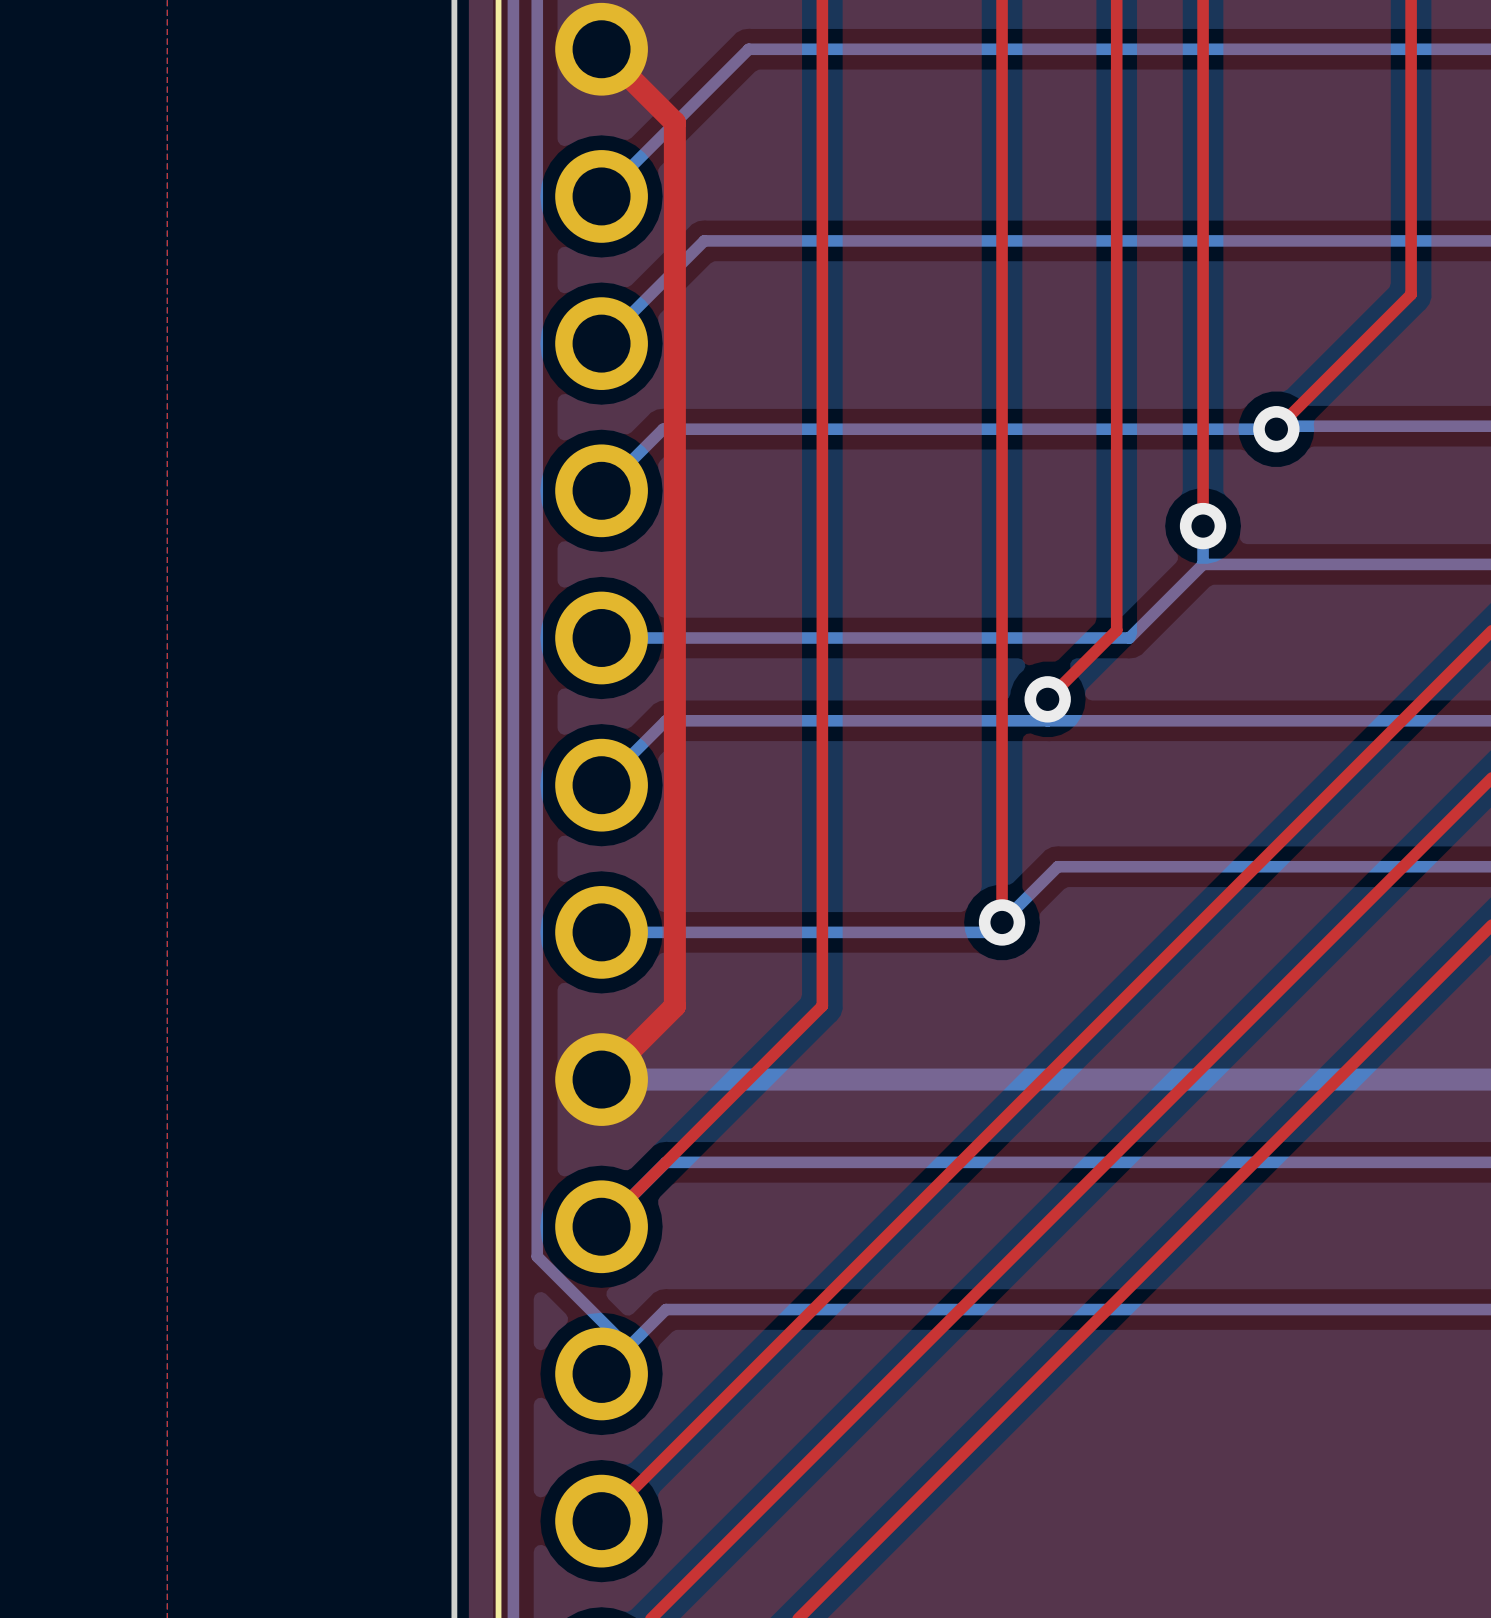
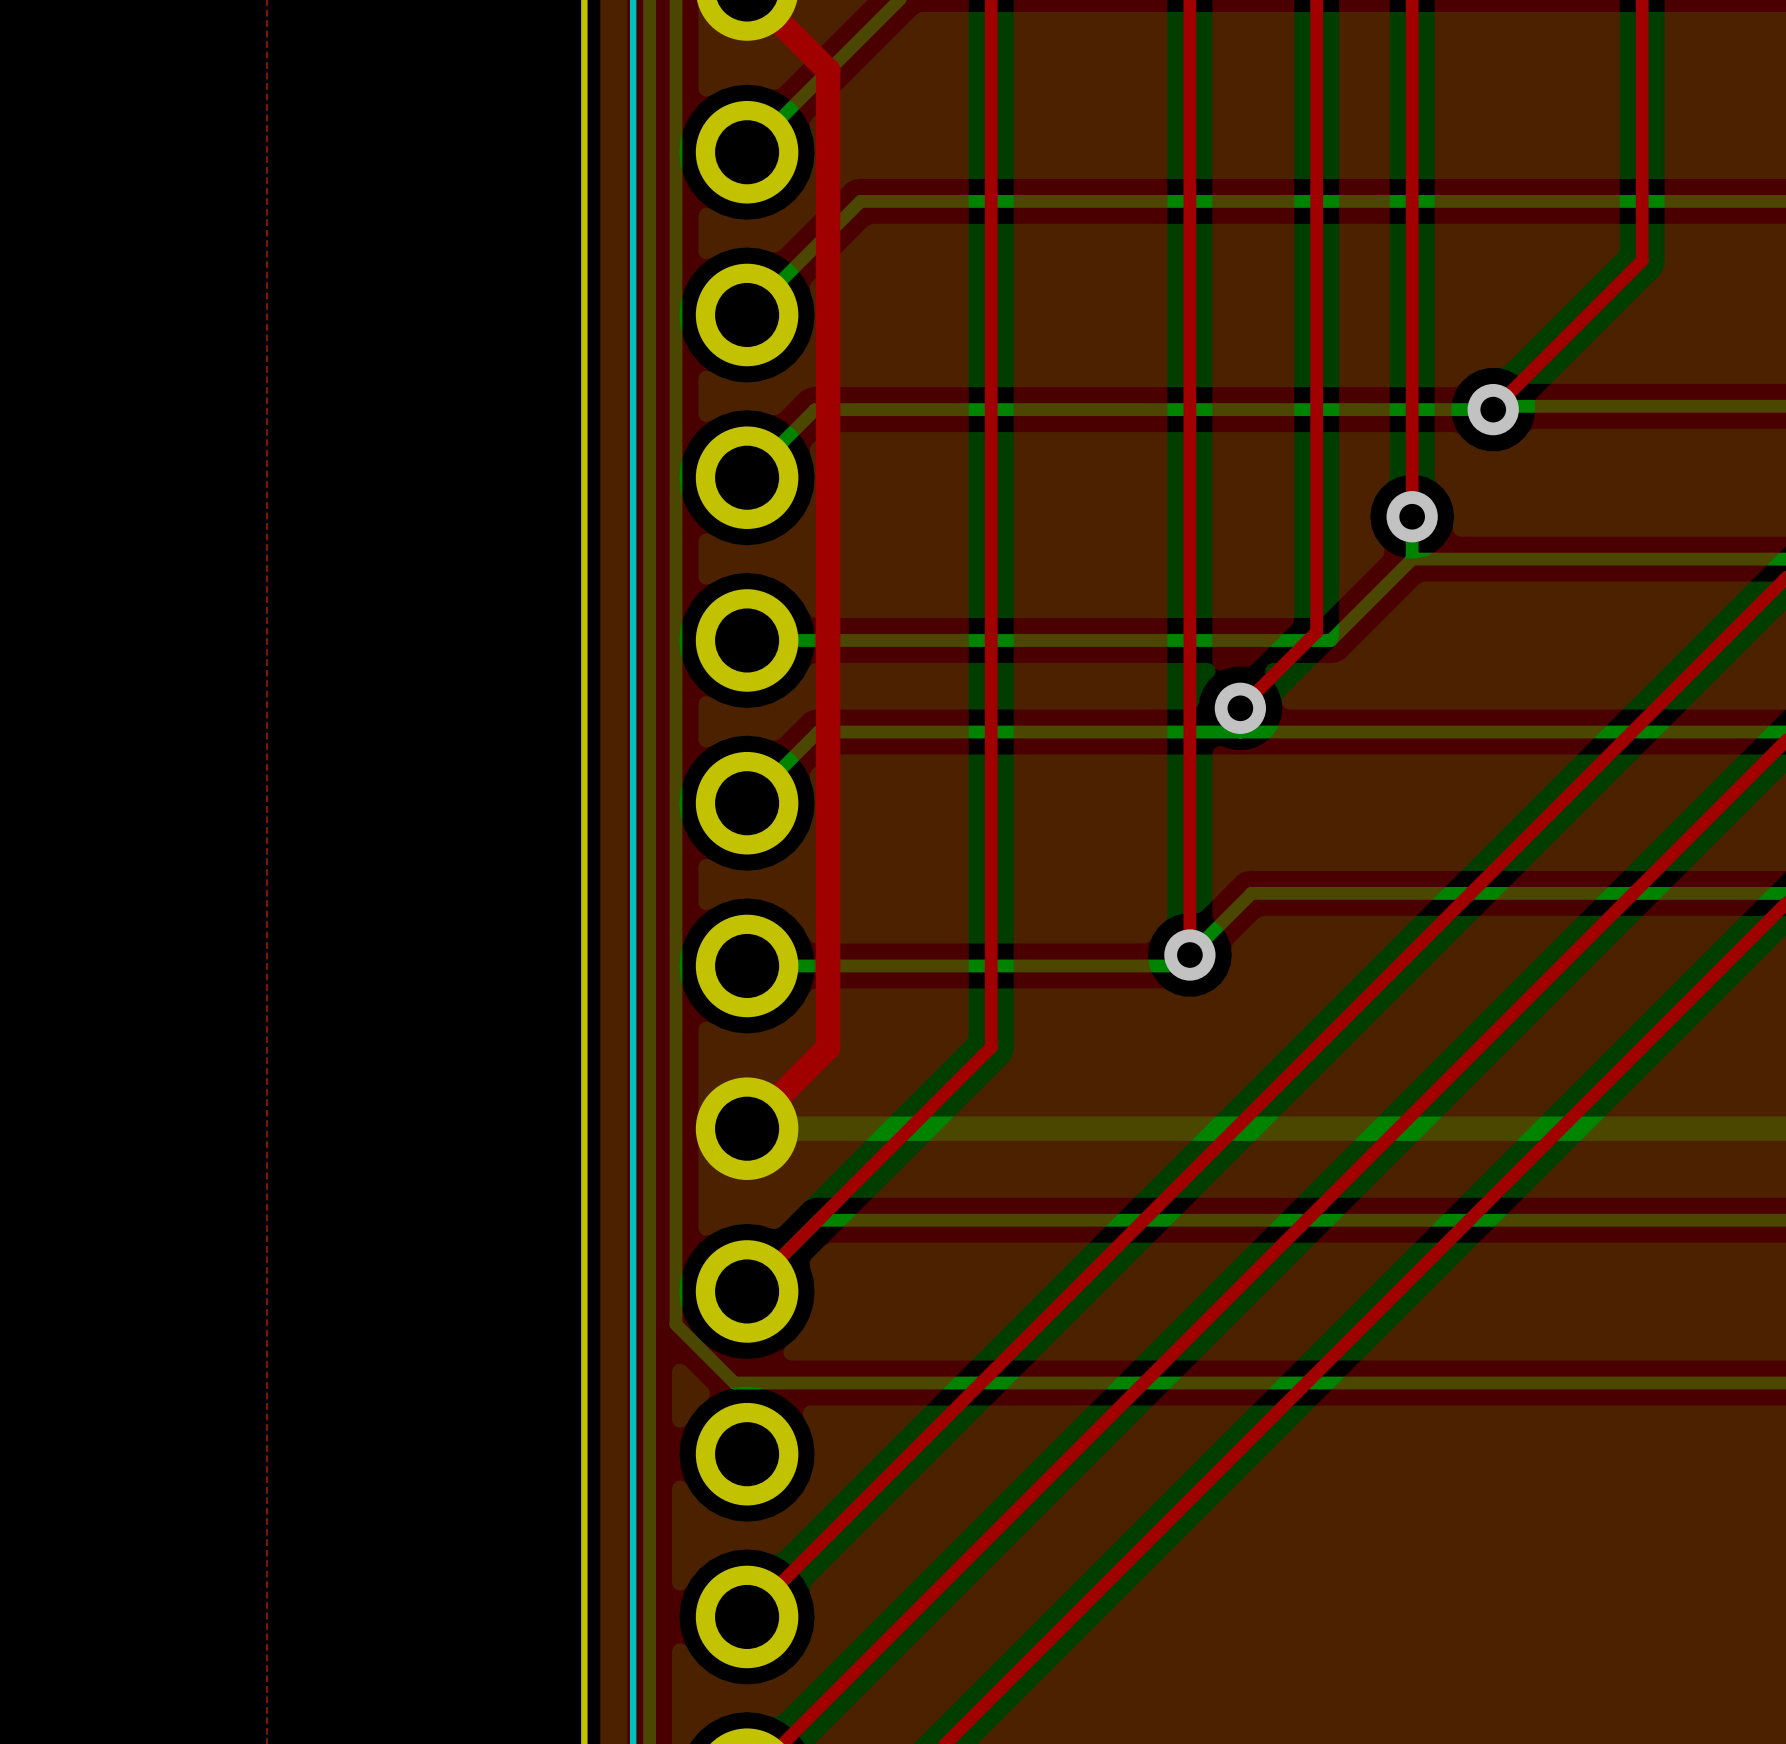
bottom track: (537, 1256) (628, 1347) (665, 1309) -> (675, 1324) (734, 1383) (818, 1383)

